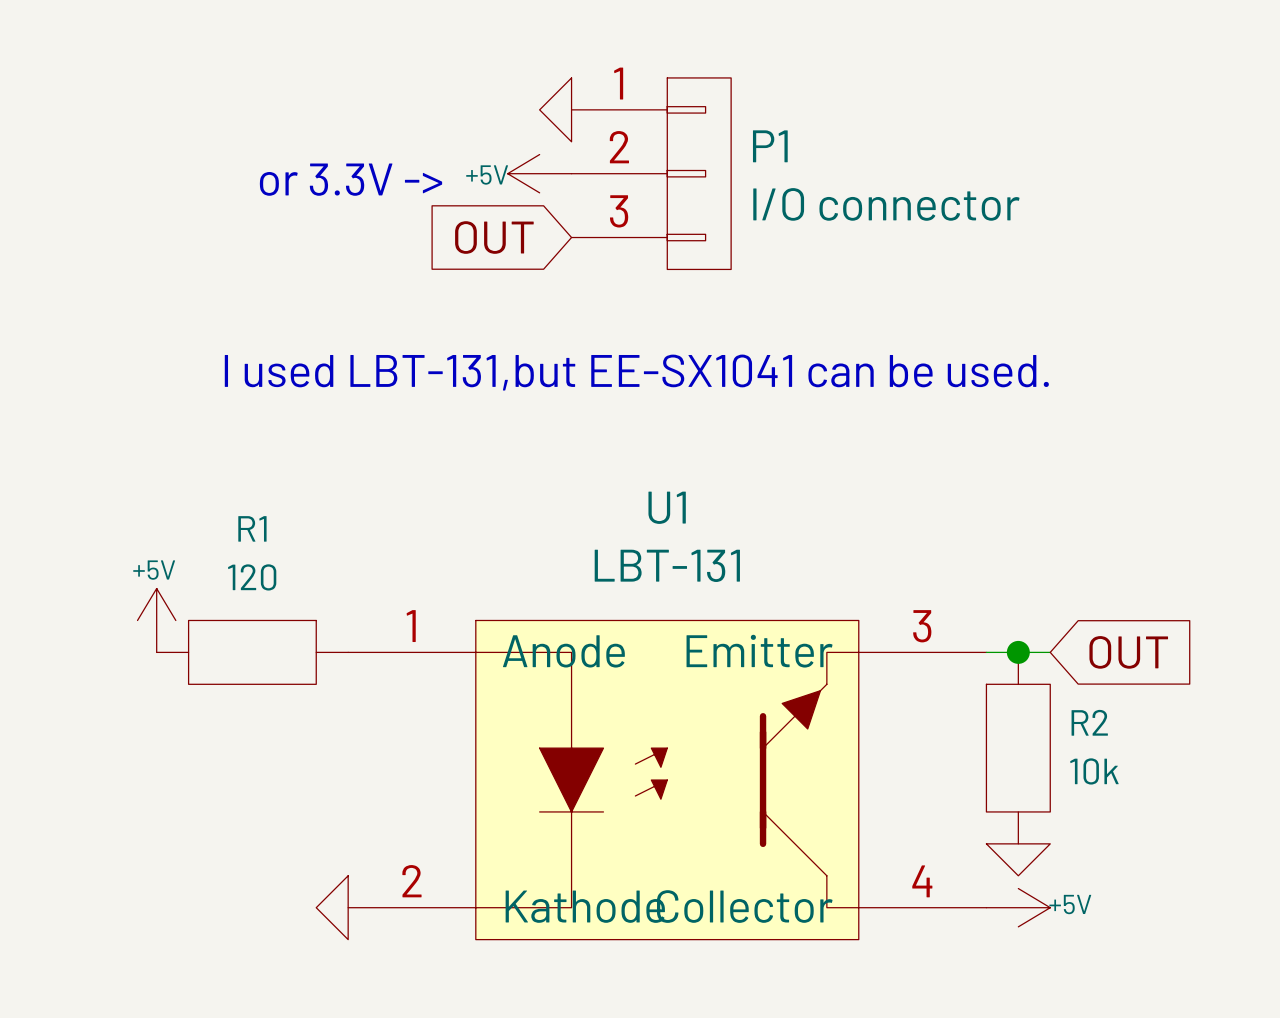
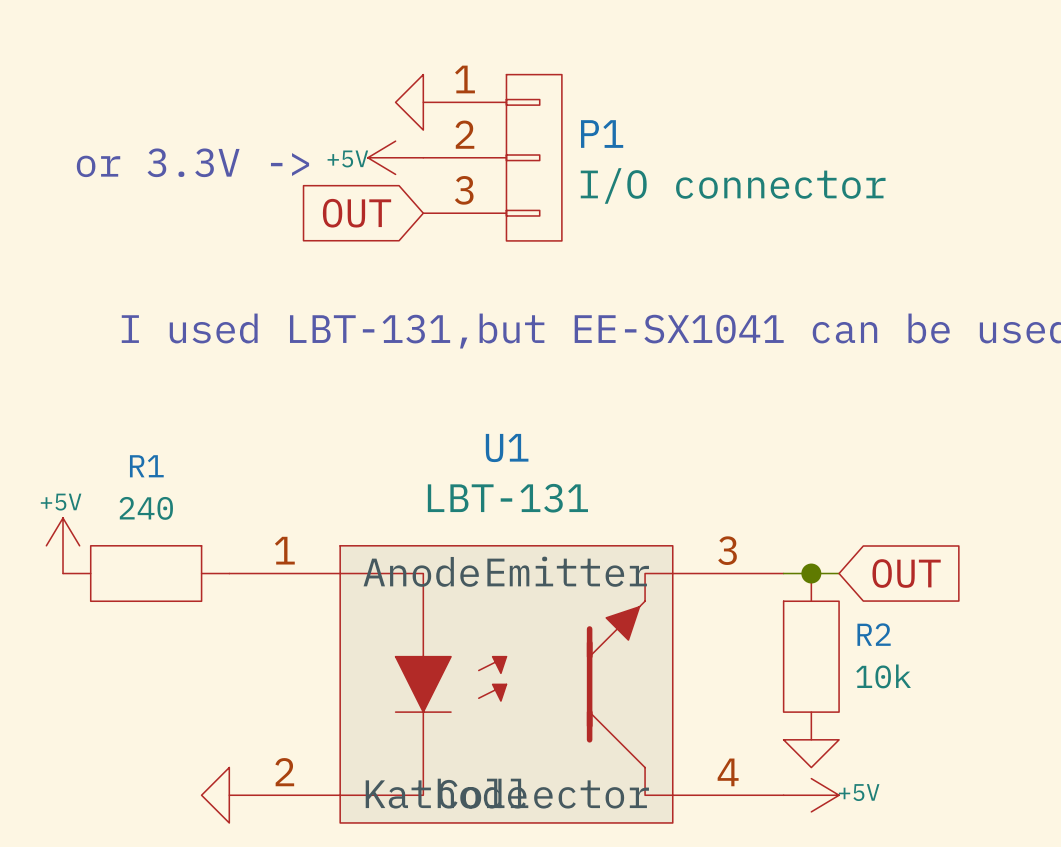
R1 value: 120 (252, 577) -> 240 (146, 508)

